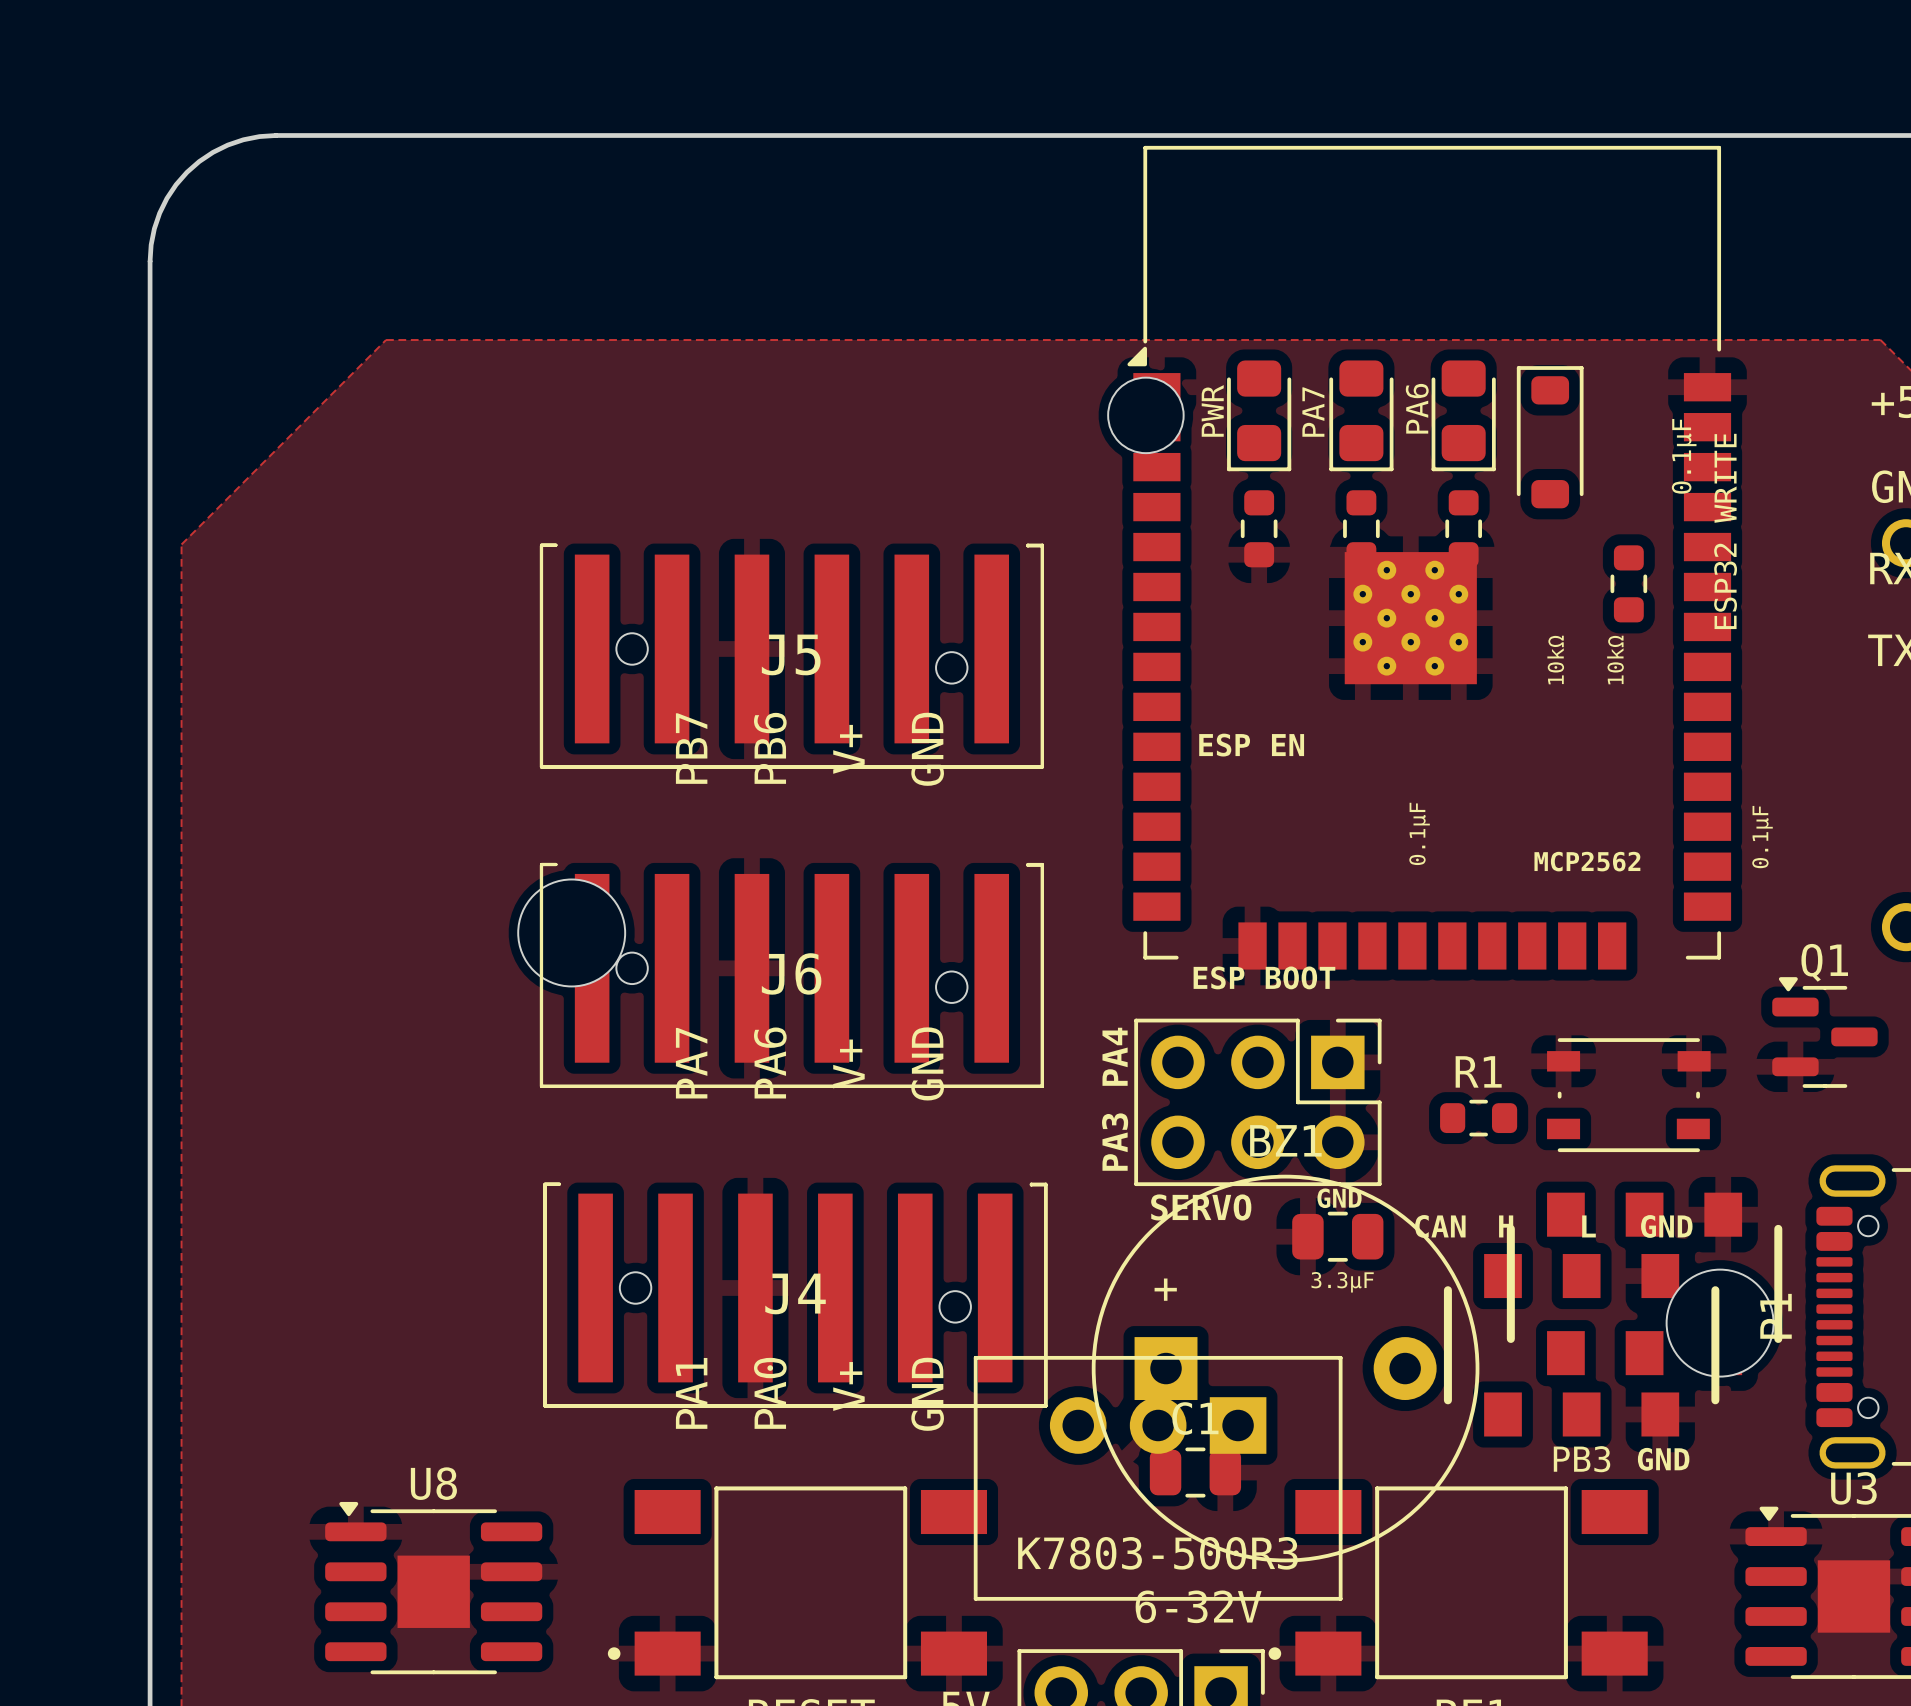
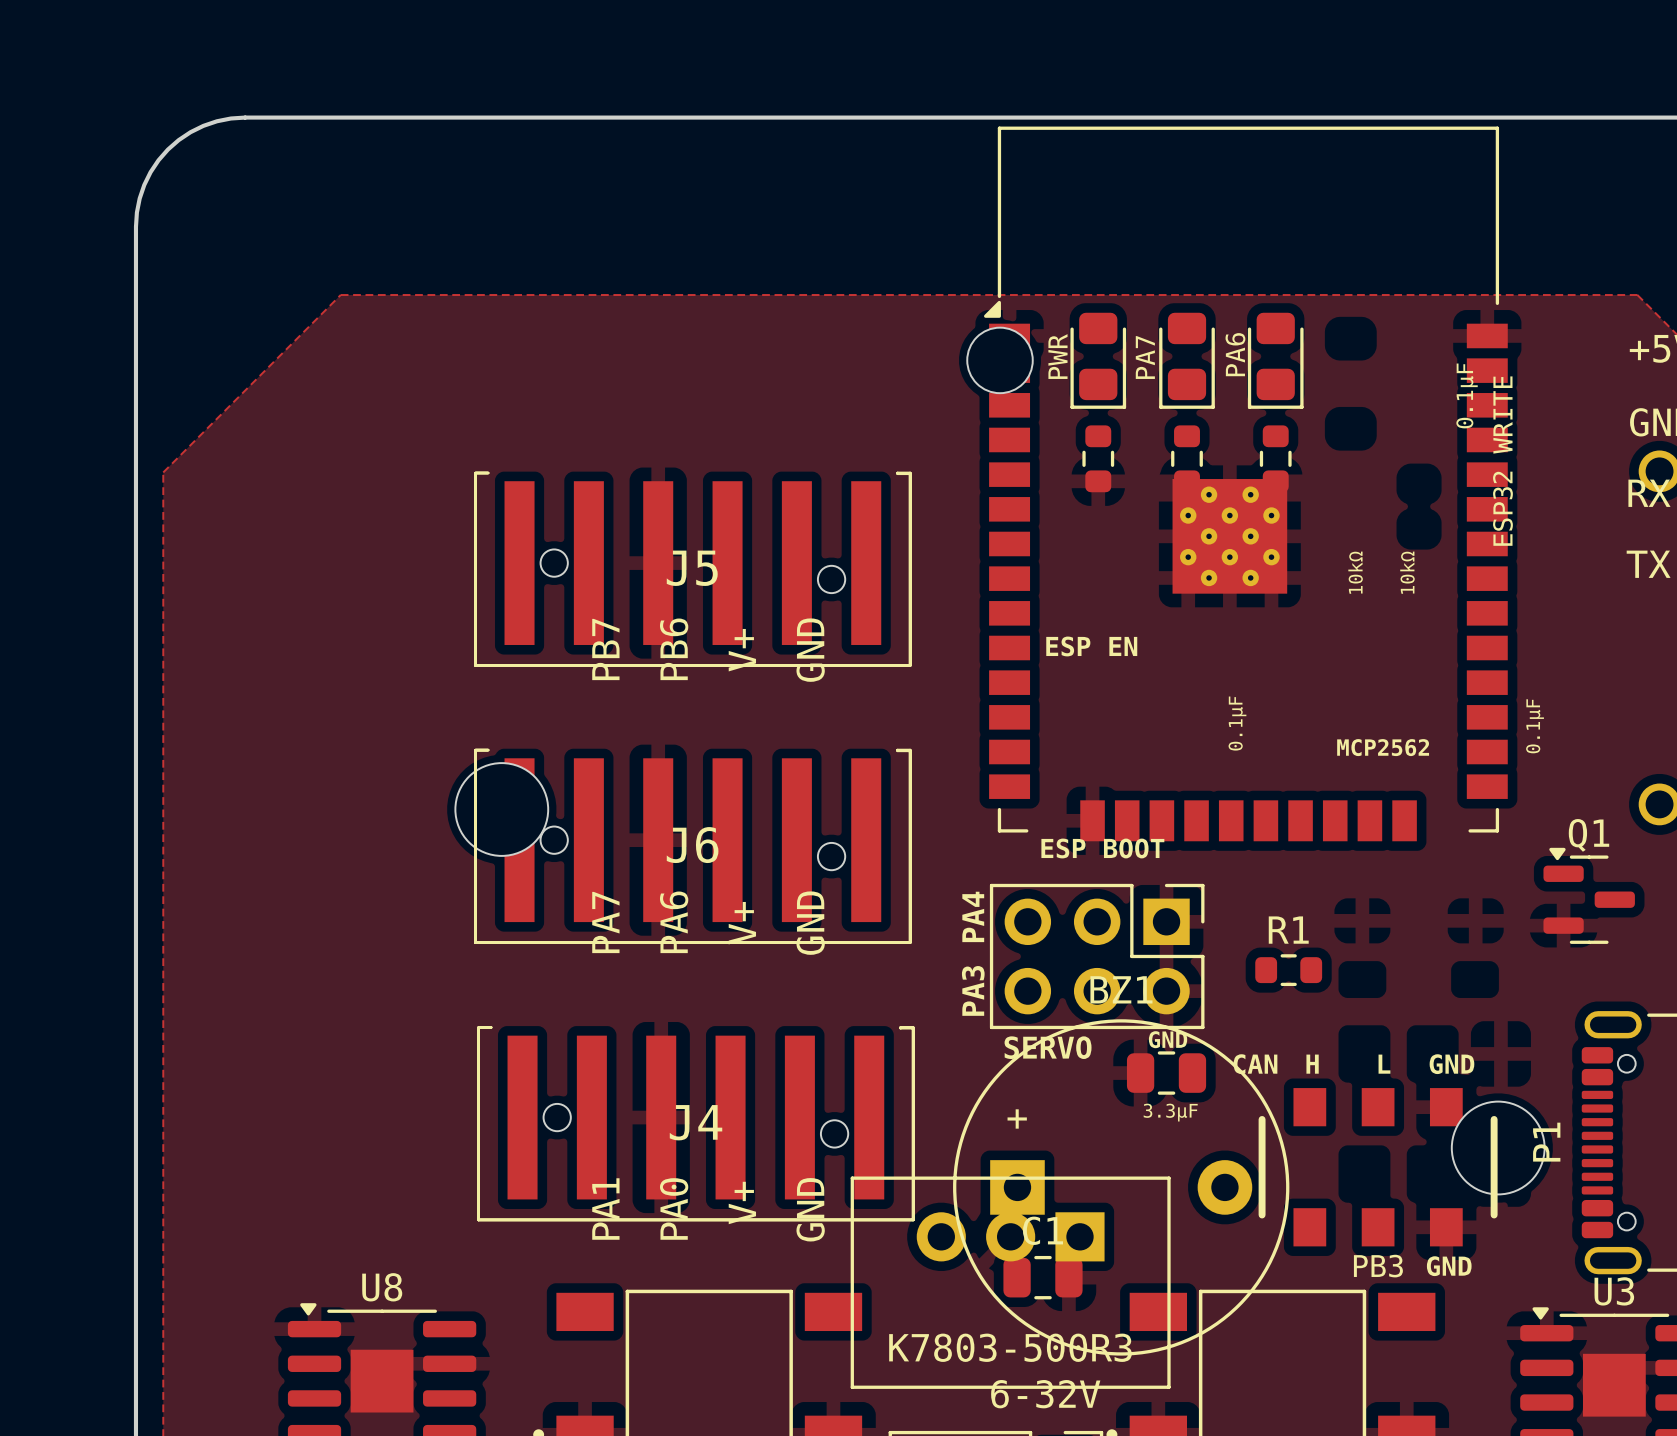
part: (1550, 437) -> none
part: (1628, 583) -> none
part: (1628, 1095) -> none
part: (1644, 1283) -> none

